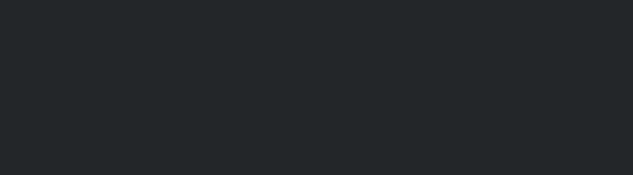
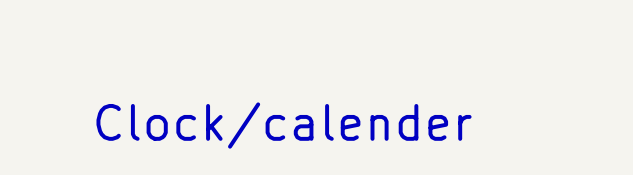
text: none -> Clock/calender (284, 125)

